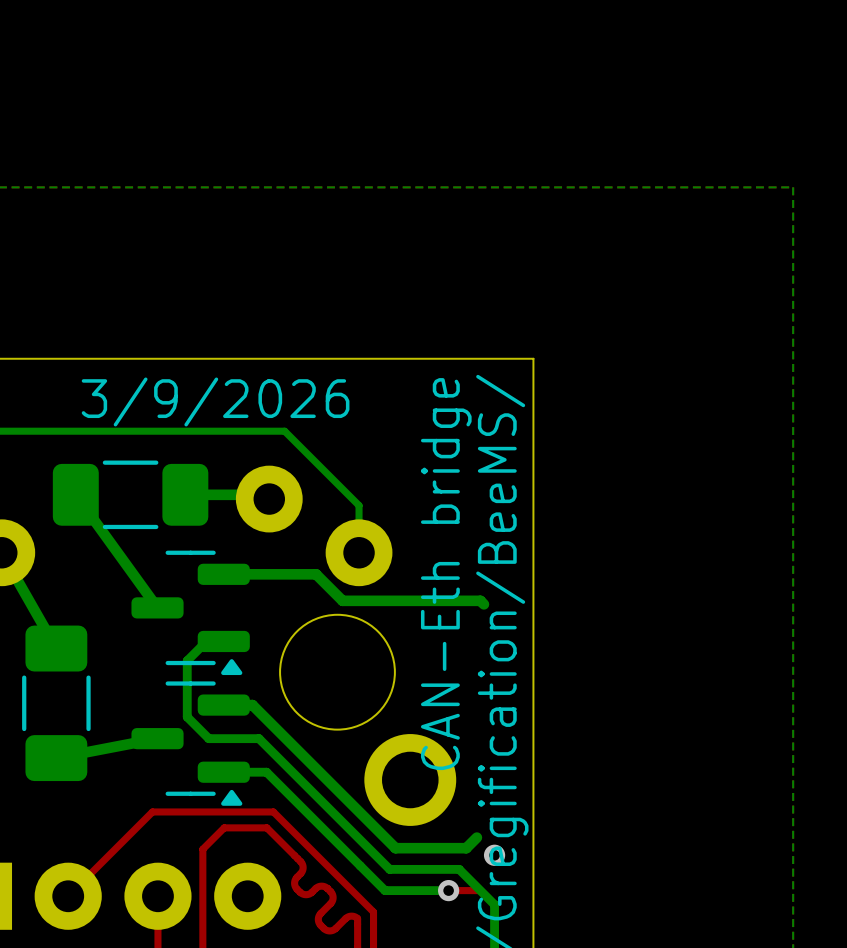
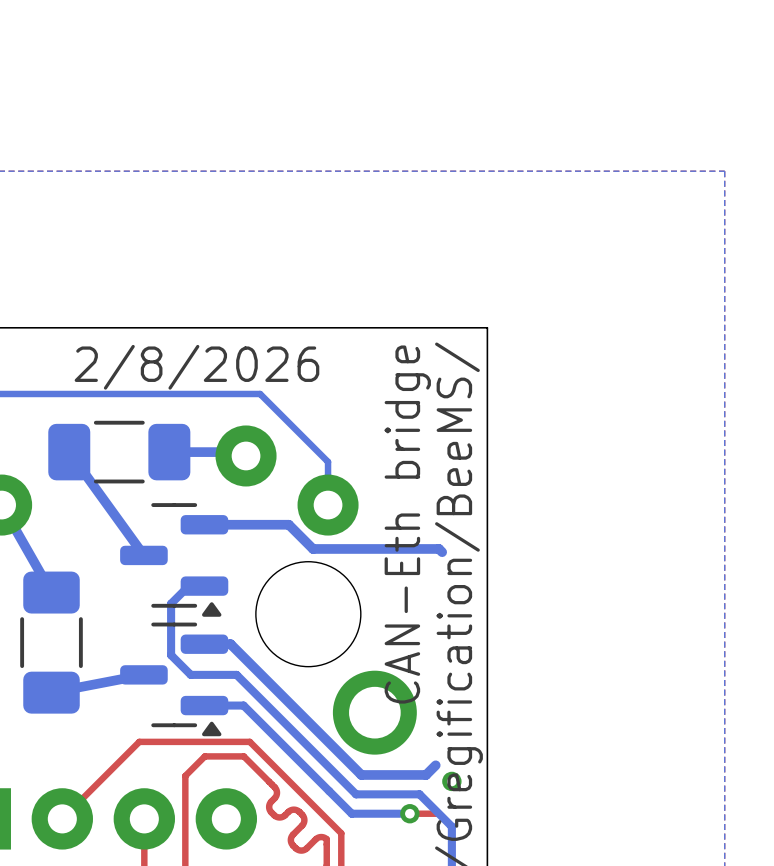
text: 3/9/2026 (215, 401) -> 2/8/2026 (196, 367)

